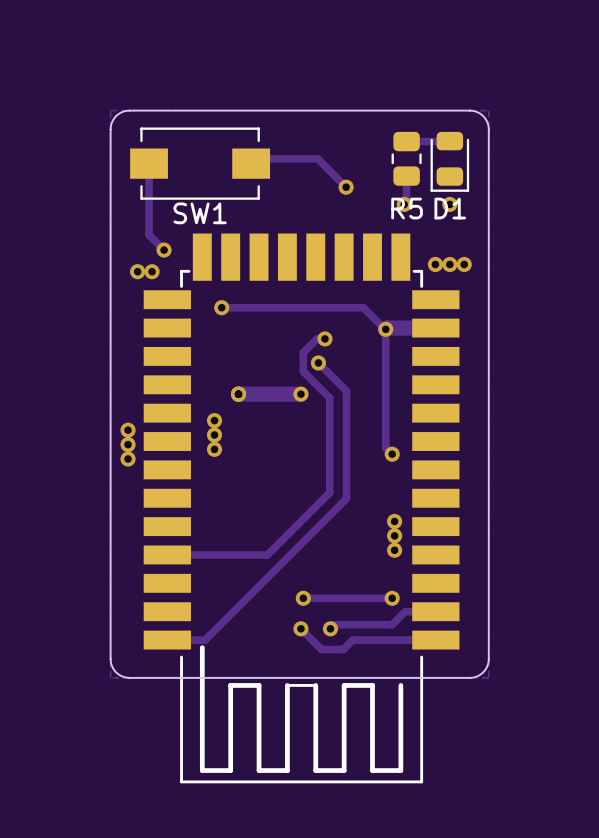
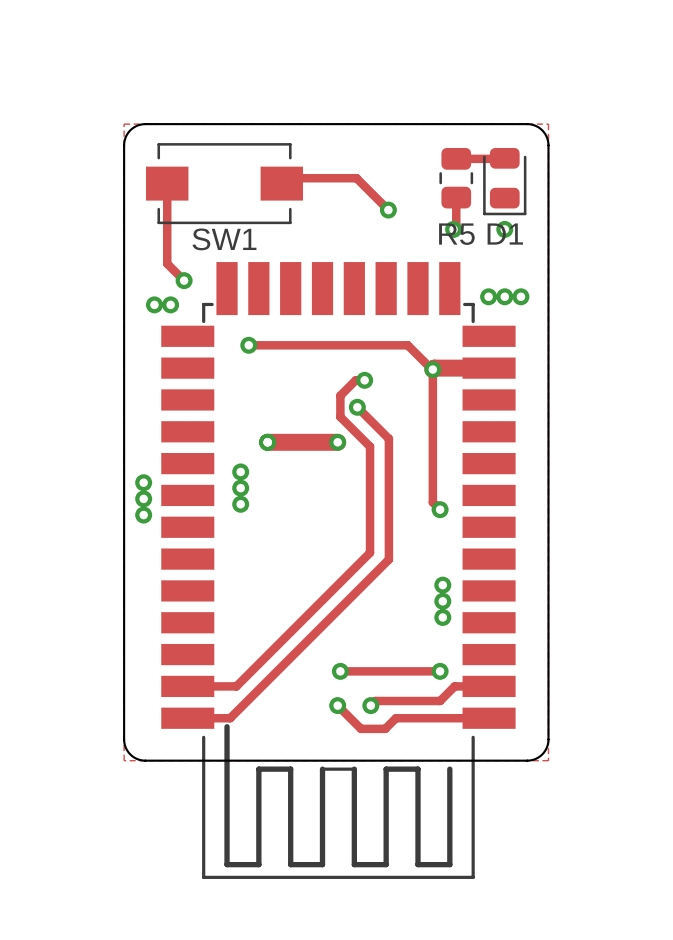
track: (167, 554) (267, 554) -> (187, 686) (236, 686) (300, 622)

